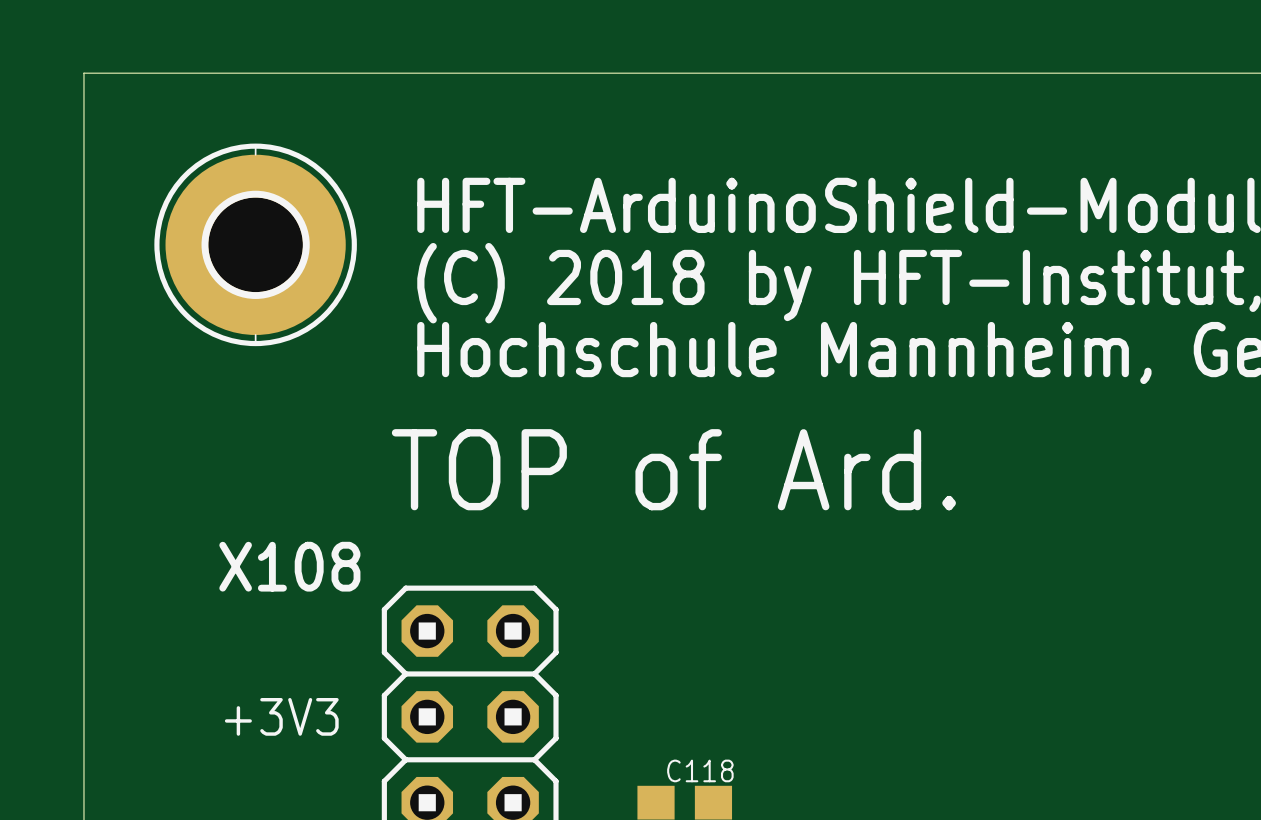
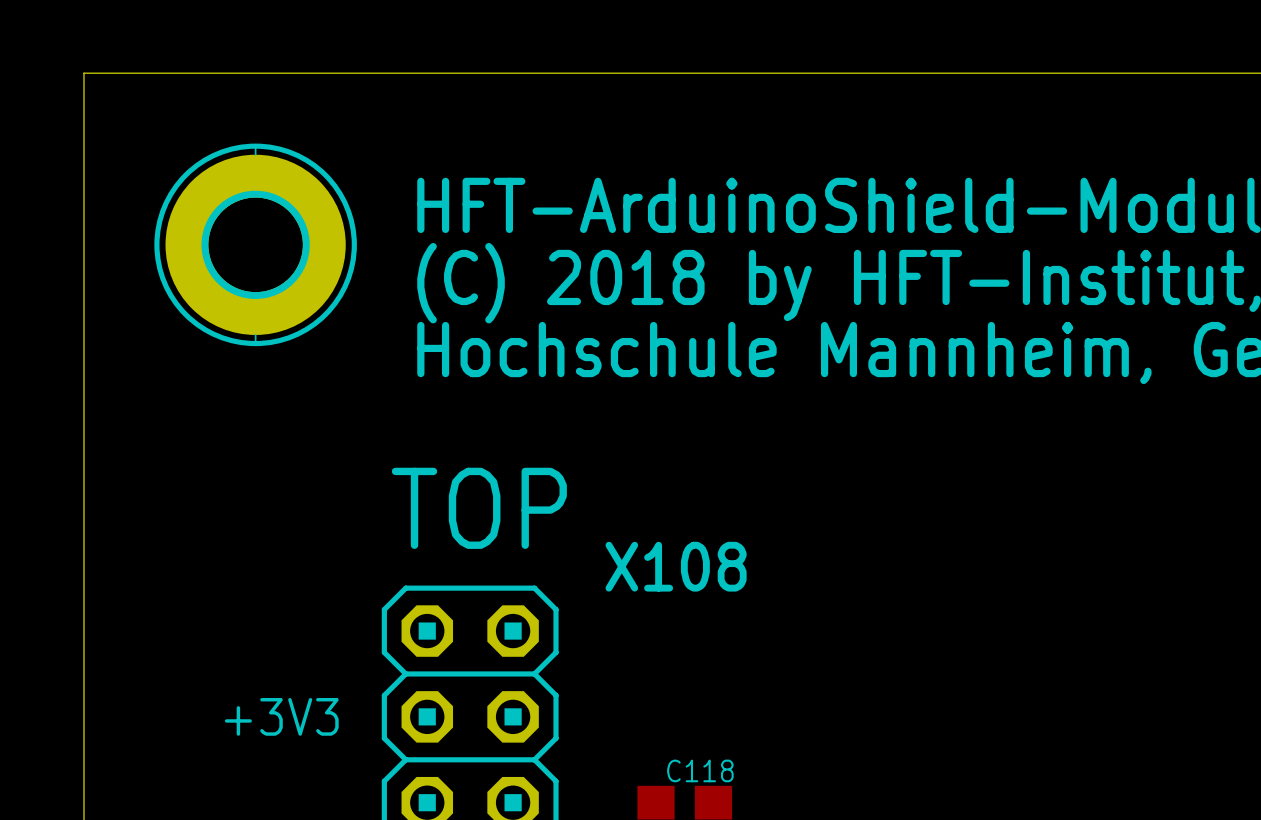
text: TOP of Ard. (673, 469) -> none
text: none -> TOP (479, 508)
X108 name position: X108 (289, 566) -> X108 (676, 566)

